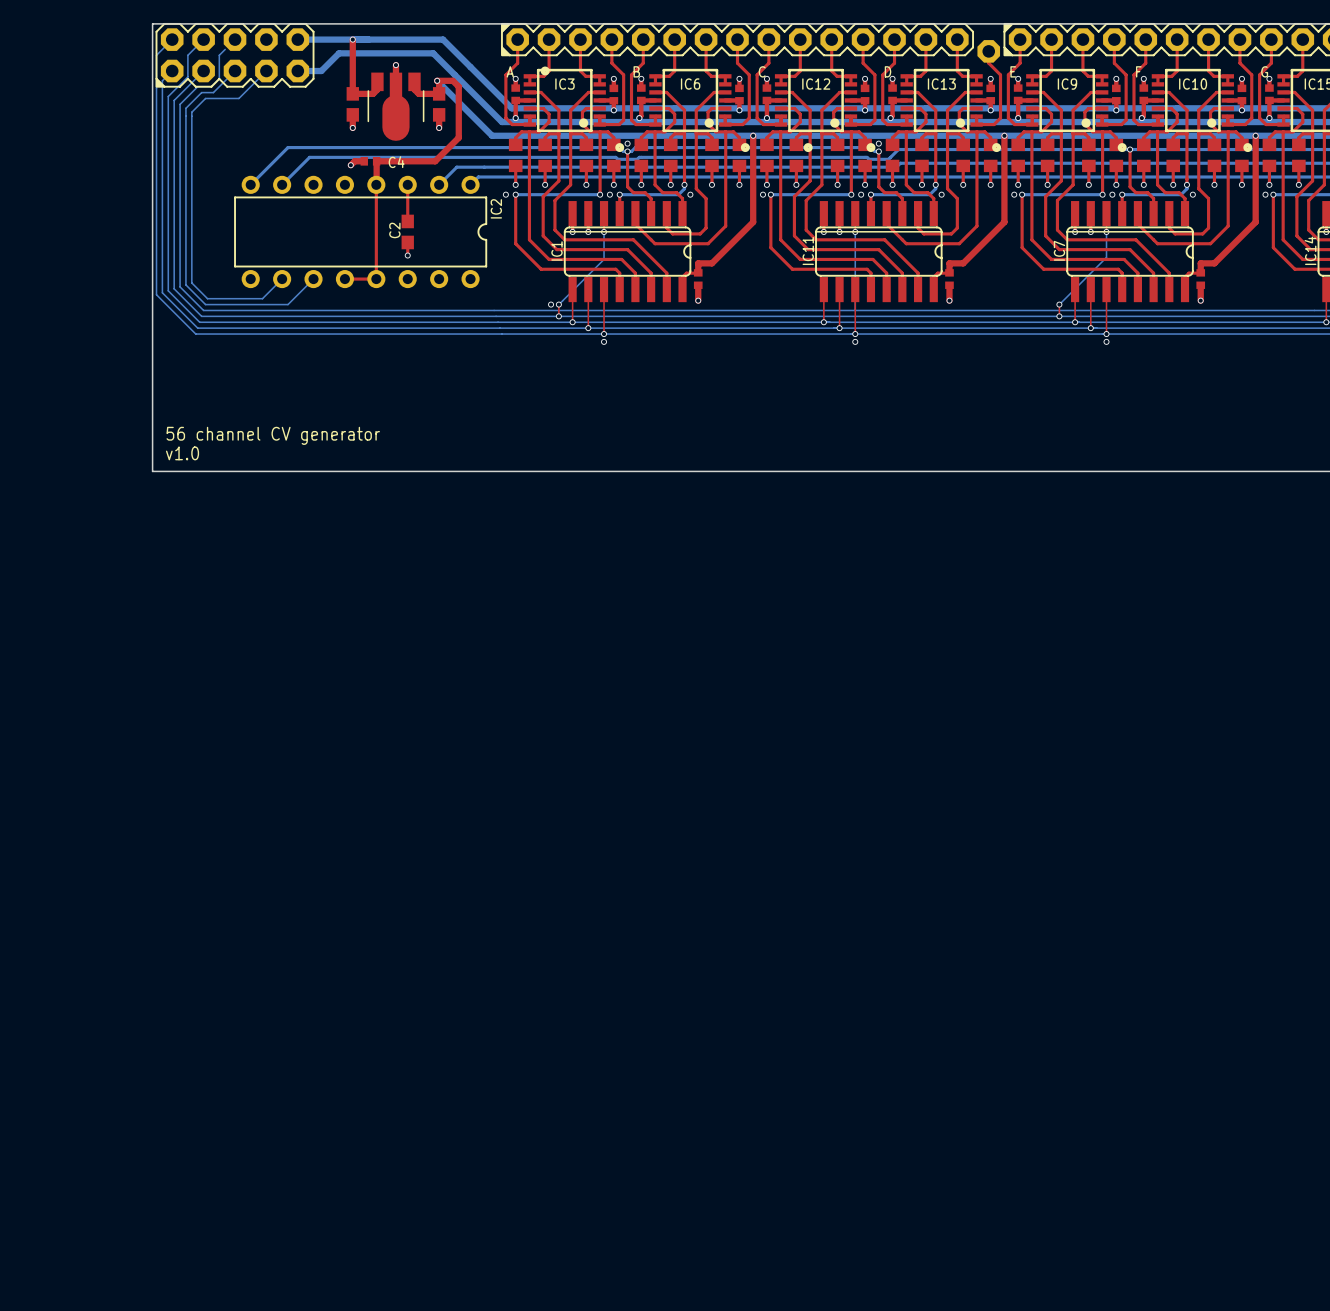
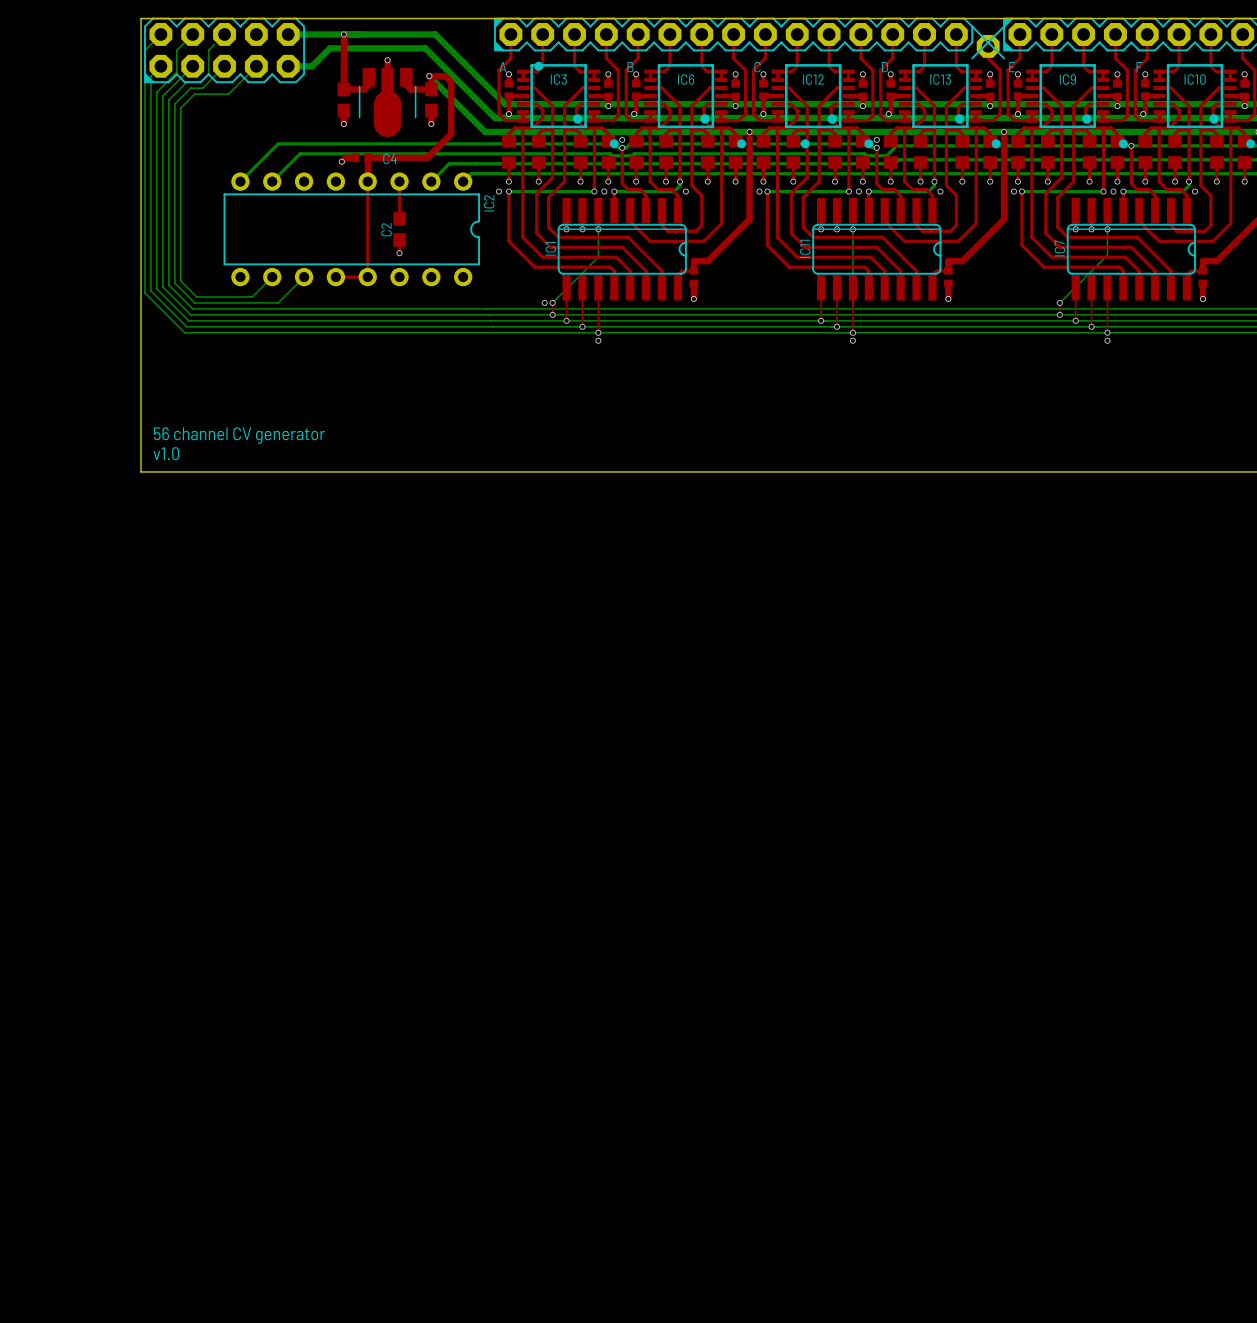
line: none -> (972, 26) (1004, 58)
line: none -> (1004, 26) (972, 58)

